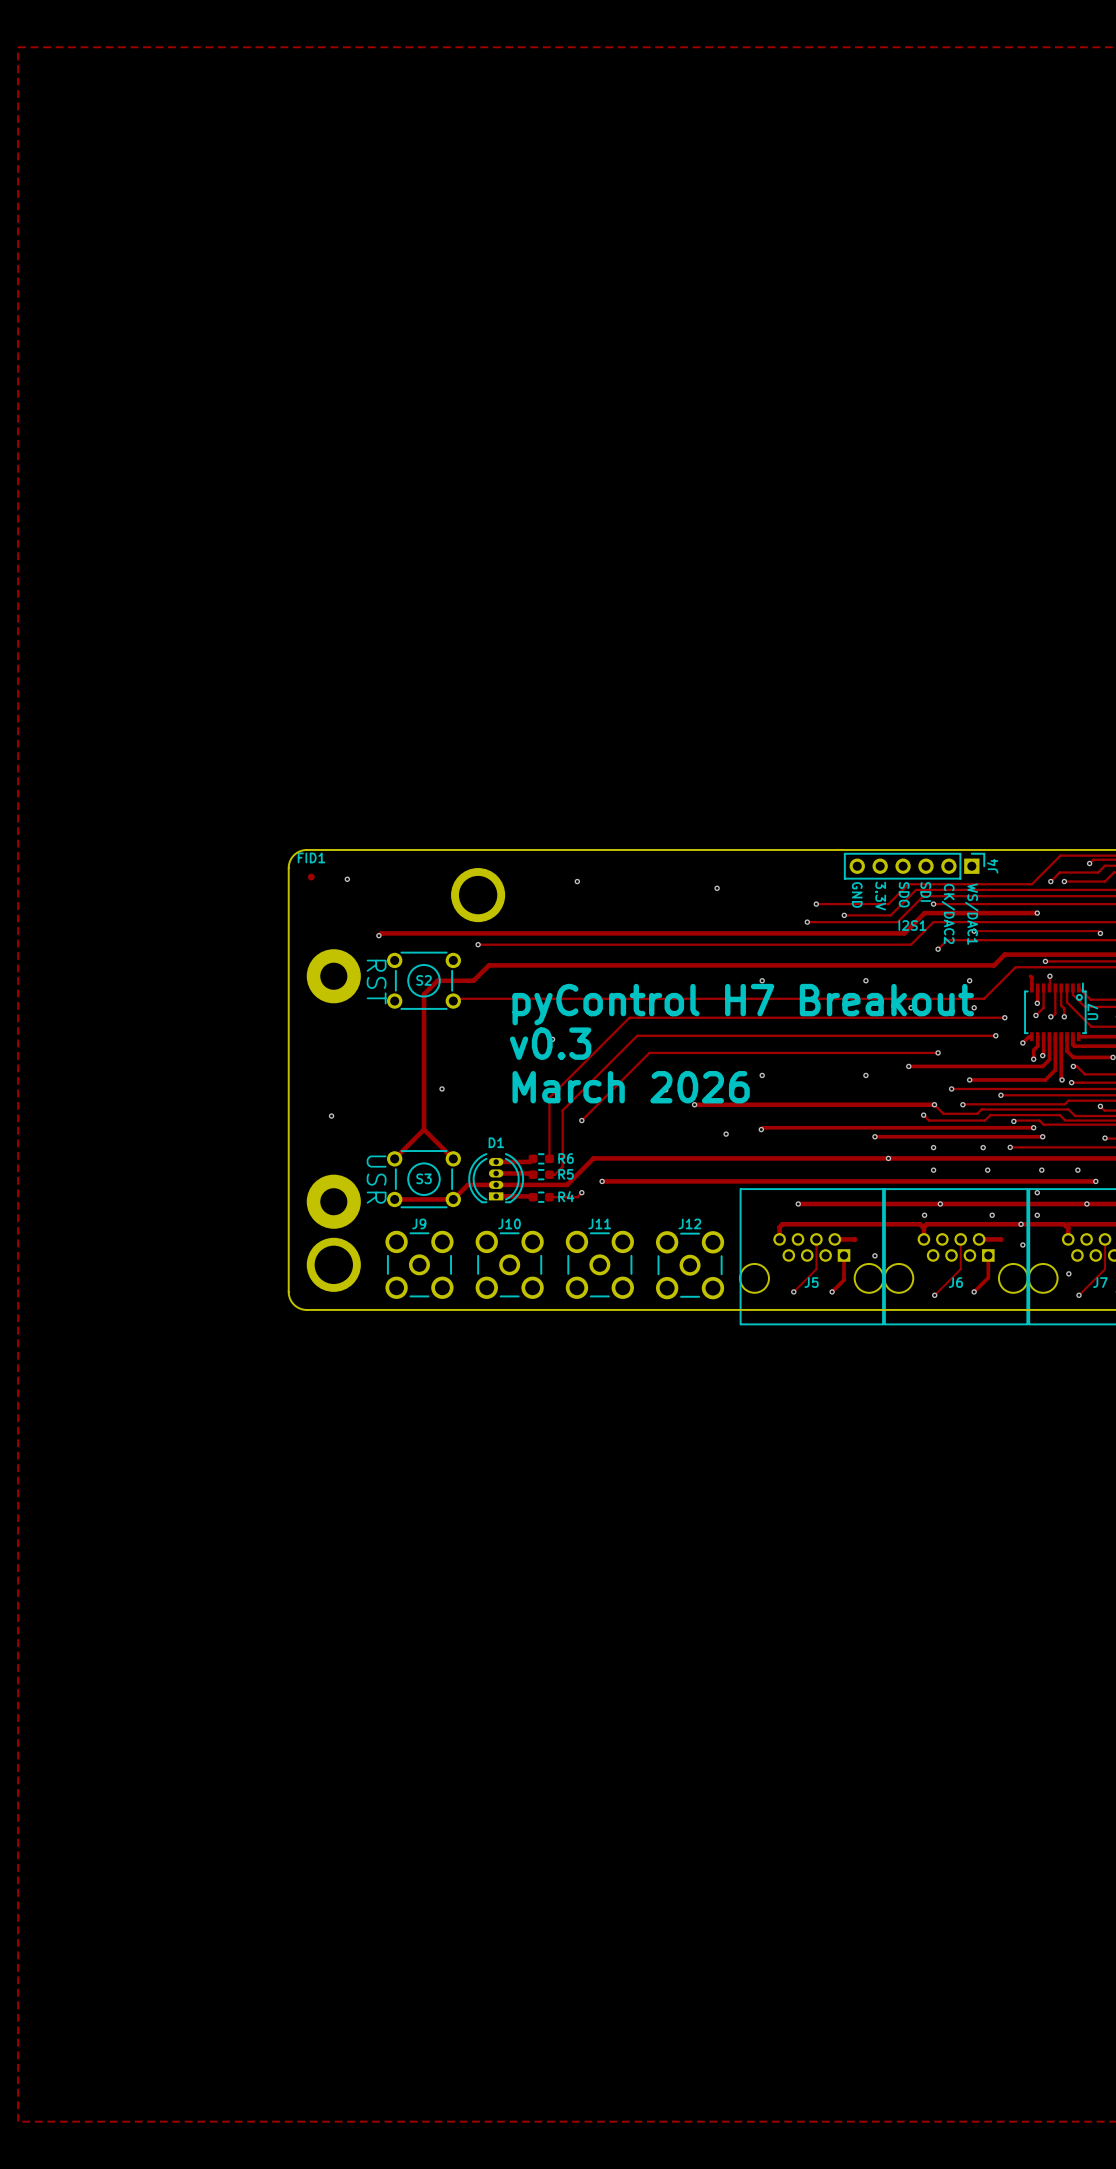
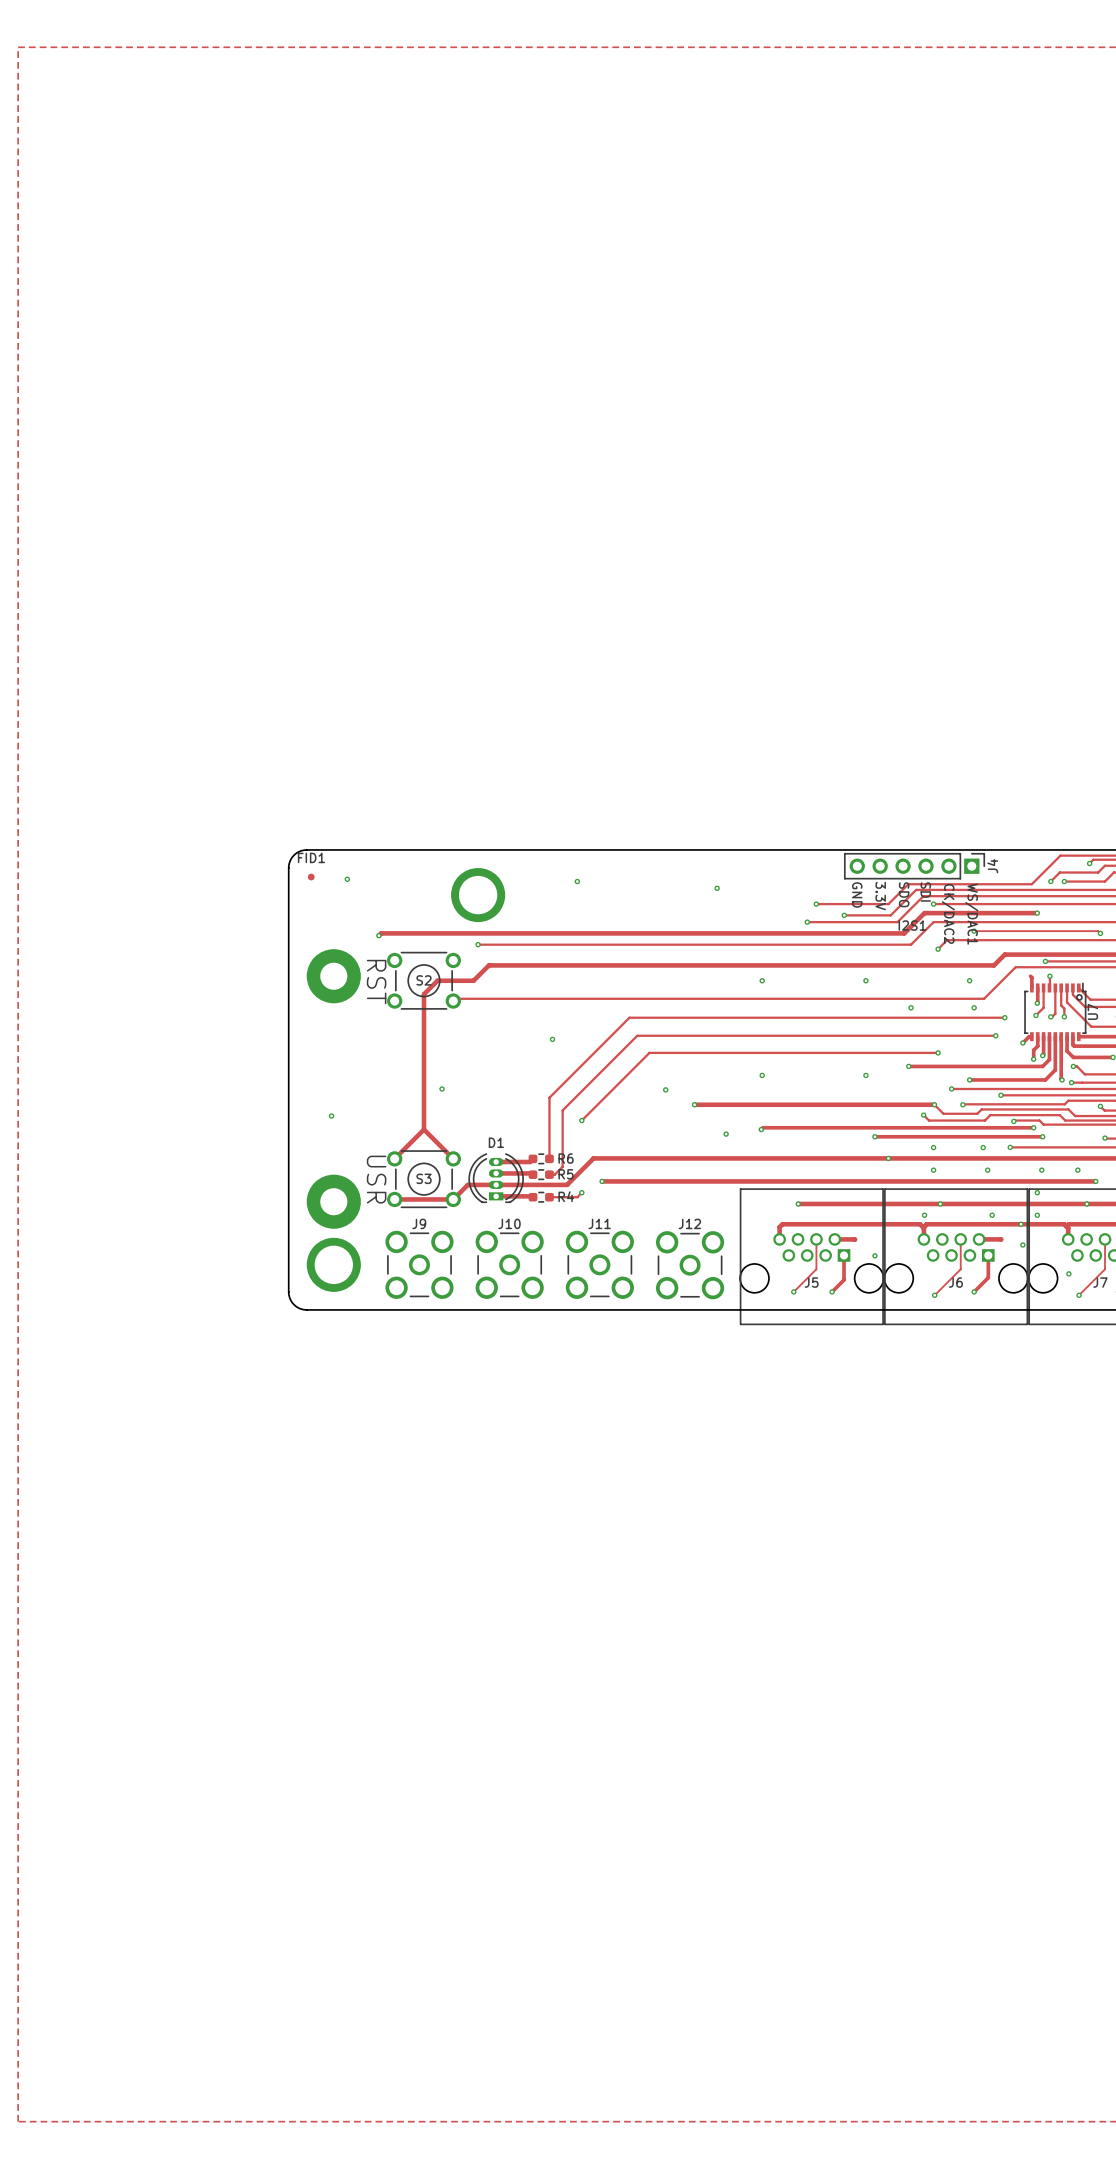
text: pyControl H7 Breakout (743, 1004) -> none
text: v0.3 (550, 1043) -> none
text: March 2026 (631, 1087) -> none

